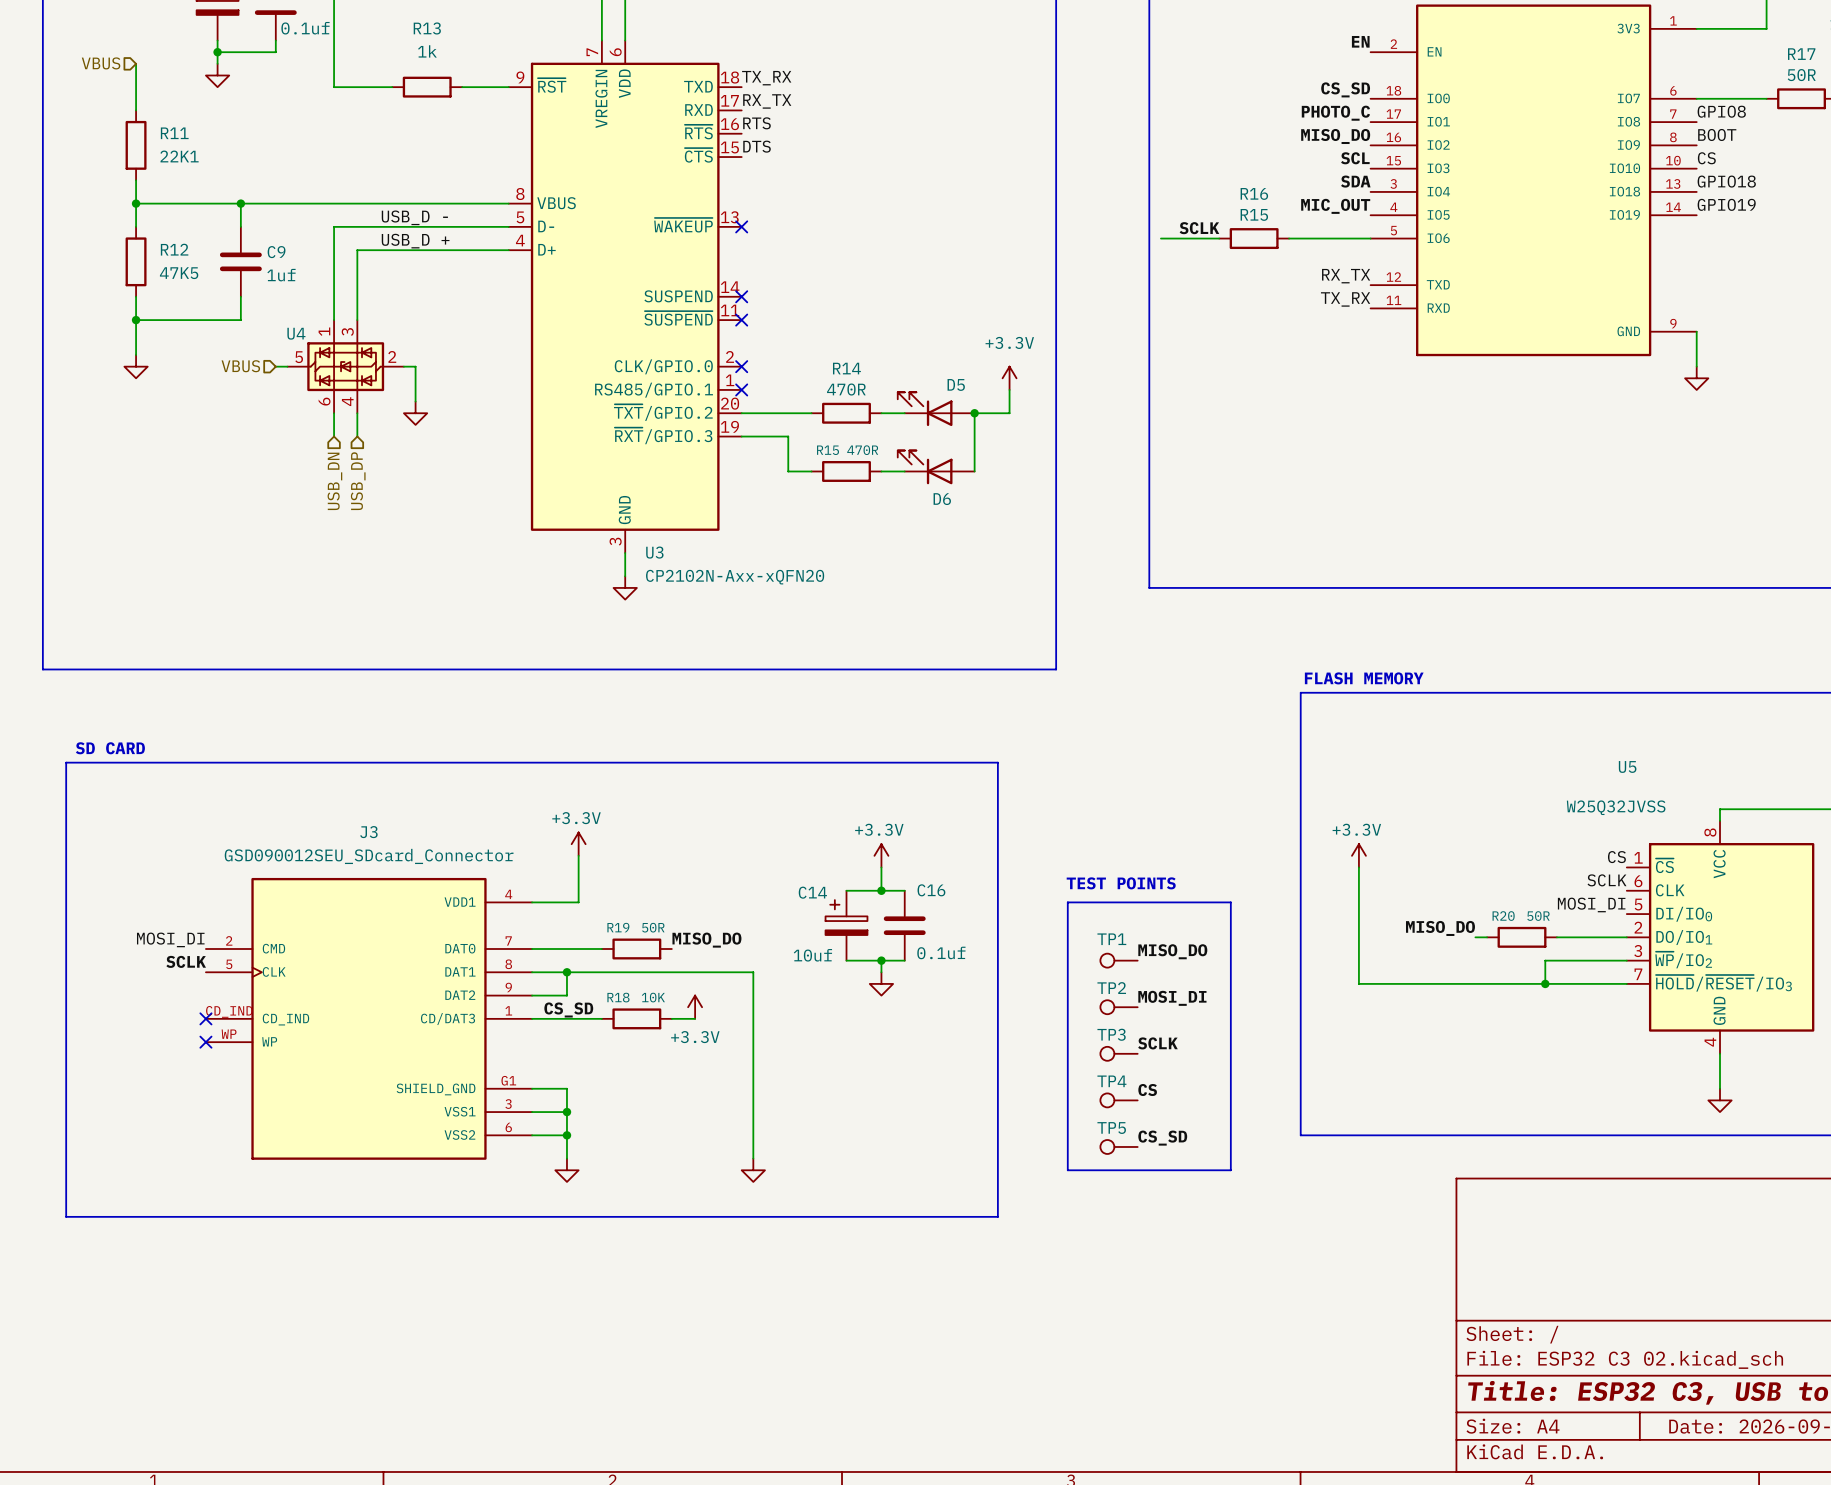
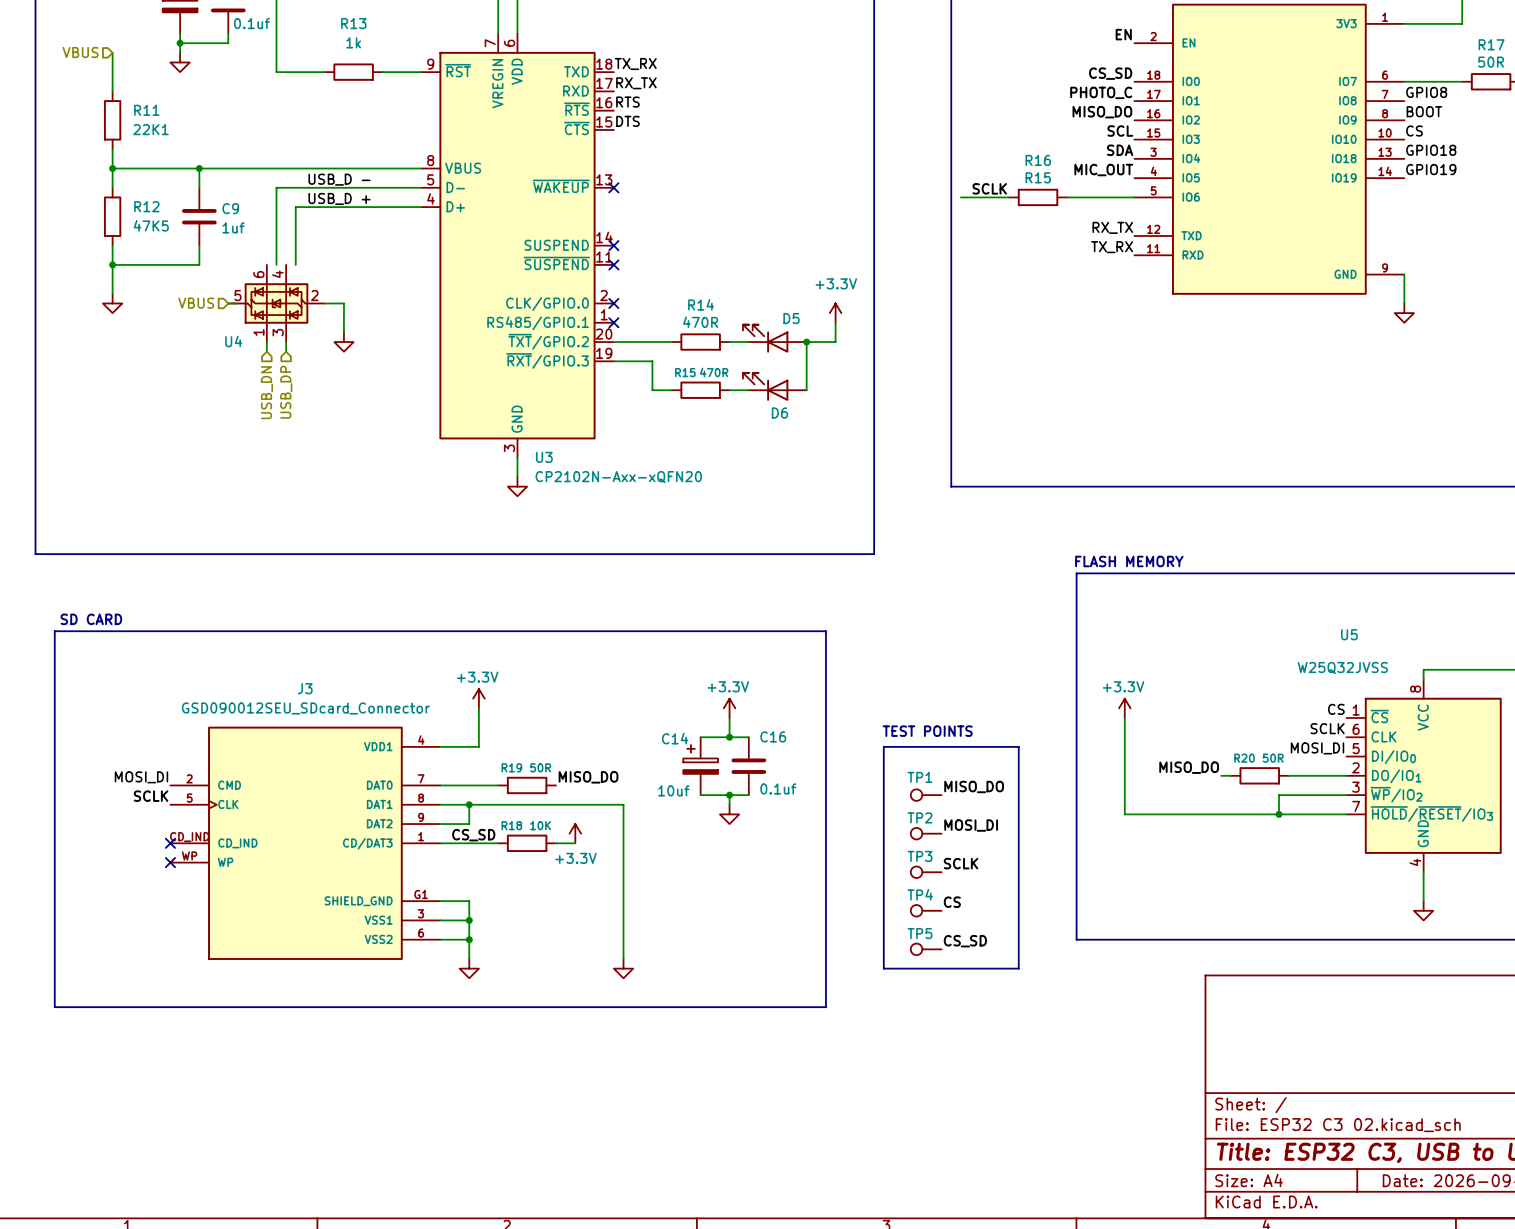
U4 flip: as is (345, 366) -> up-down (276, 303)
wire: none -> (266, 342) (266, 351)
wire: (334, 413) (334, 436) -> none
wire: none -> (286, 342) (286, 351)
wire: (357, 413) (357, 436) -> none
hierarchical label position: USB_DN (334, 481) -> USB_DN (266, 392)
hierarchical label position: USB_DP (358, 481) -> USB_DP (286, 392)

